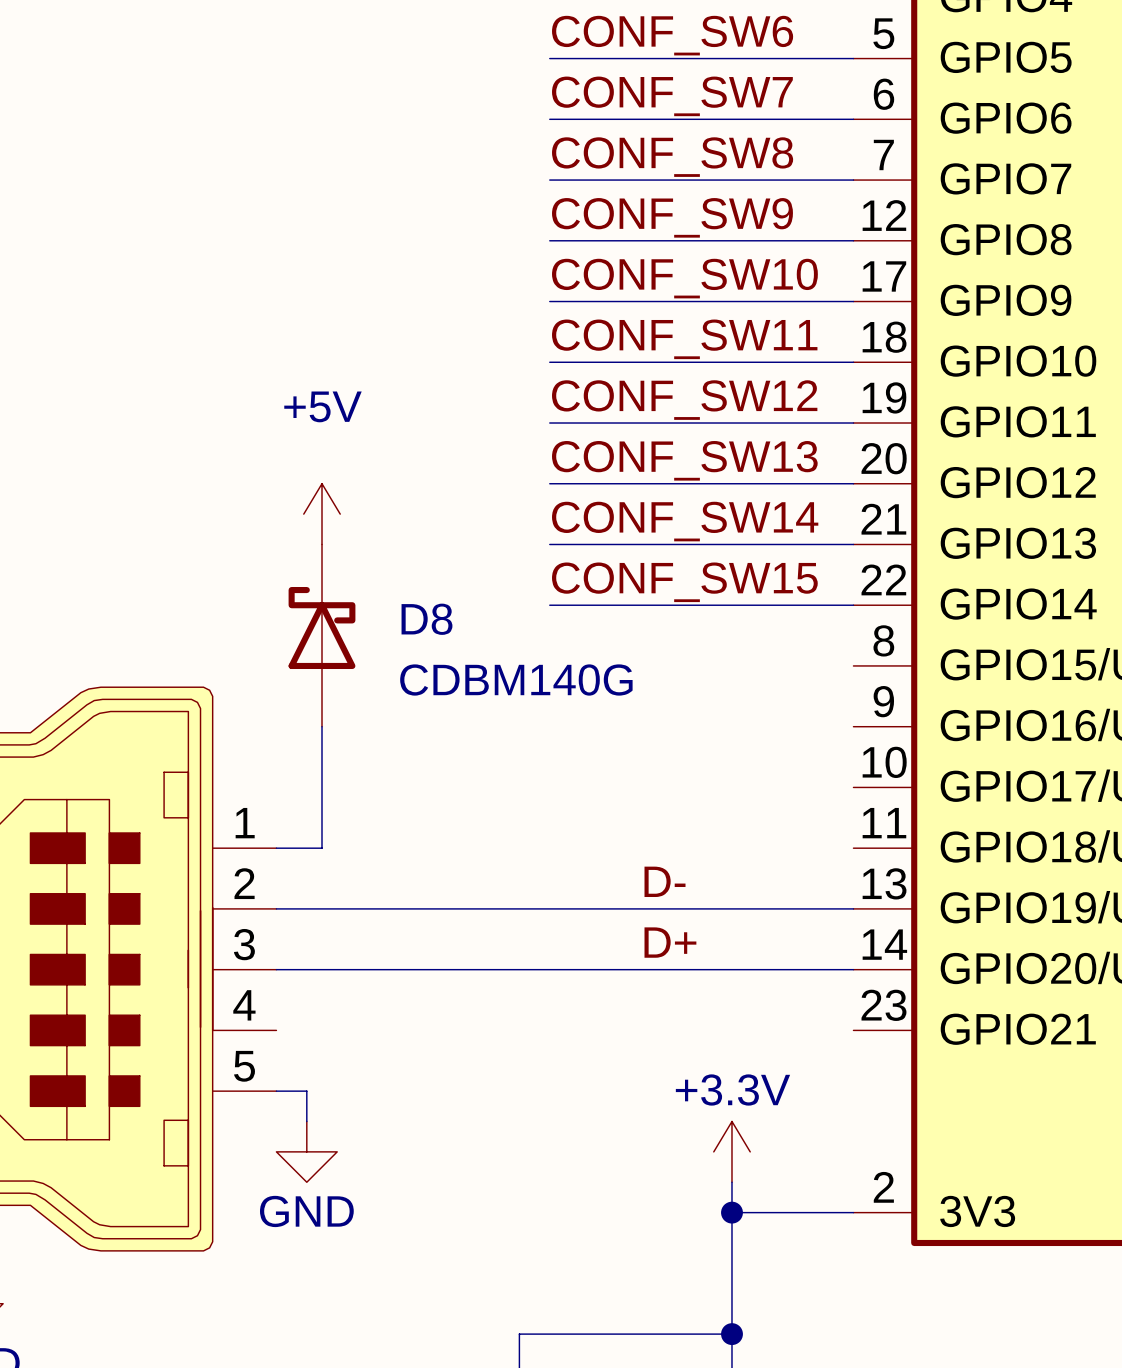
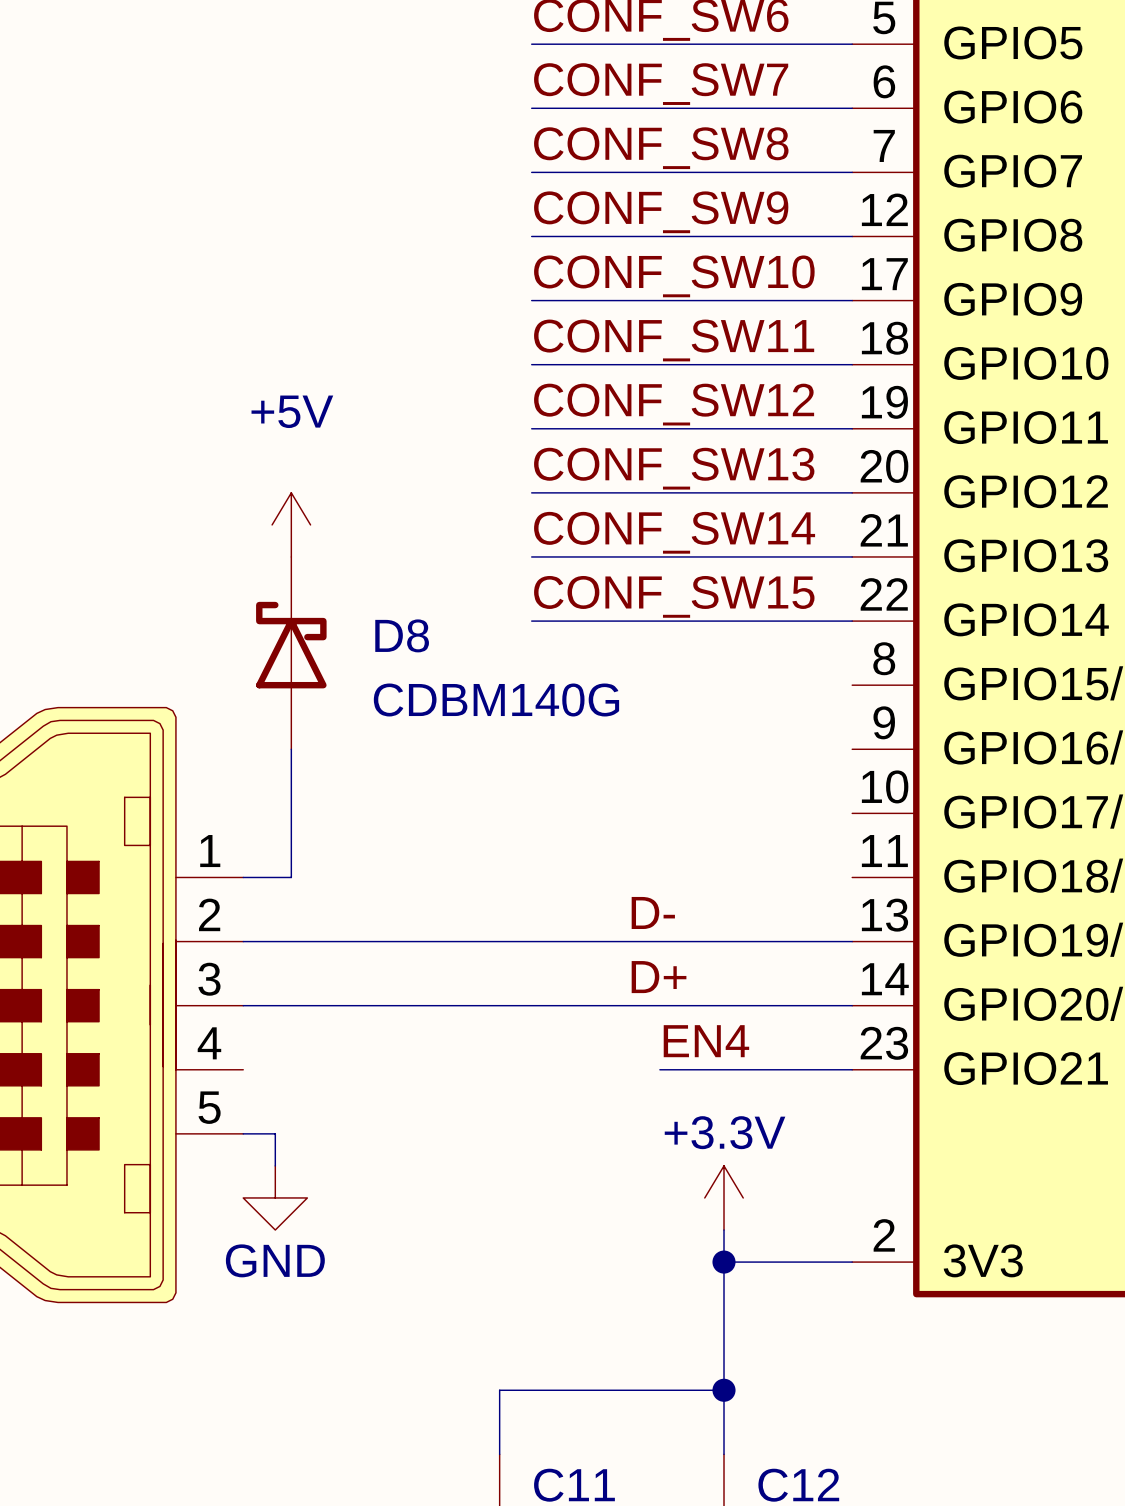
label: none -> EN4 (706, 1041)
wire: none -> (659, 1069) (852, 1069)

